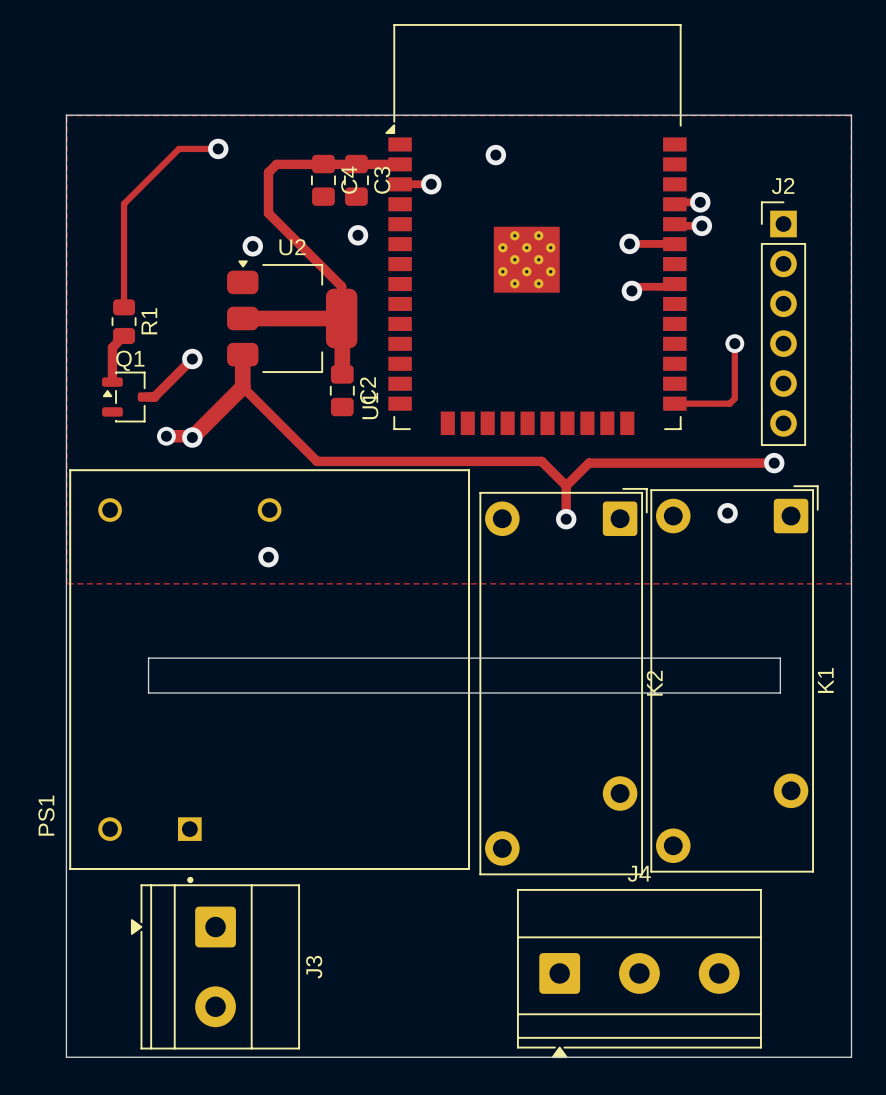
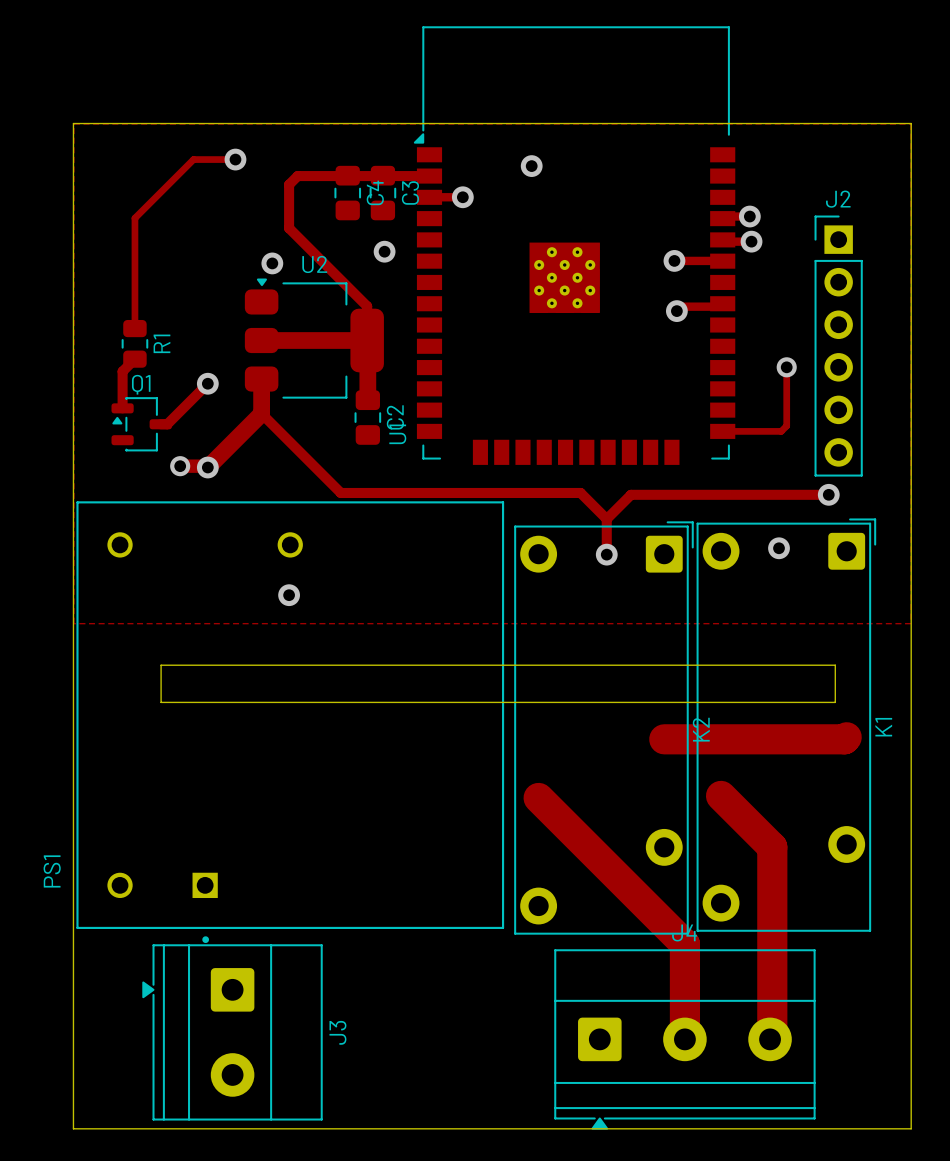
board edge: (148, 658) (780, 658) (780, 692) (148, 692) (148, 658) -> (161, 665) (835, 665) (835, 702) (161, 702) (161, 665)
track: none -> (846, 737) (844, 739) (664, 739)
track: none -> (721, 795) (772, 847) (772, 1037) (770, 1039)
track: none -> (538, 797) (684, 944) (684, 1039)

